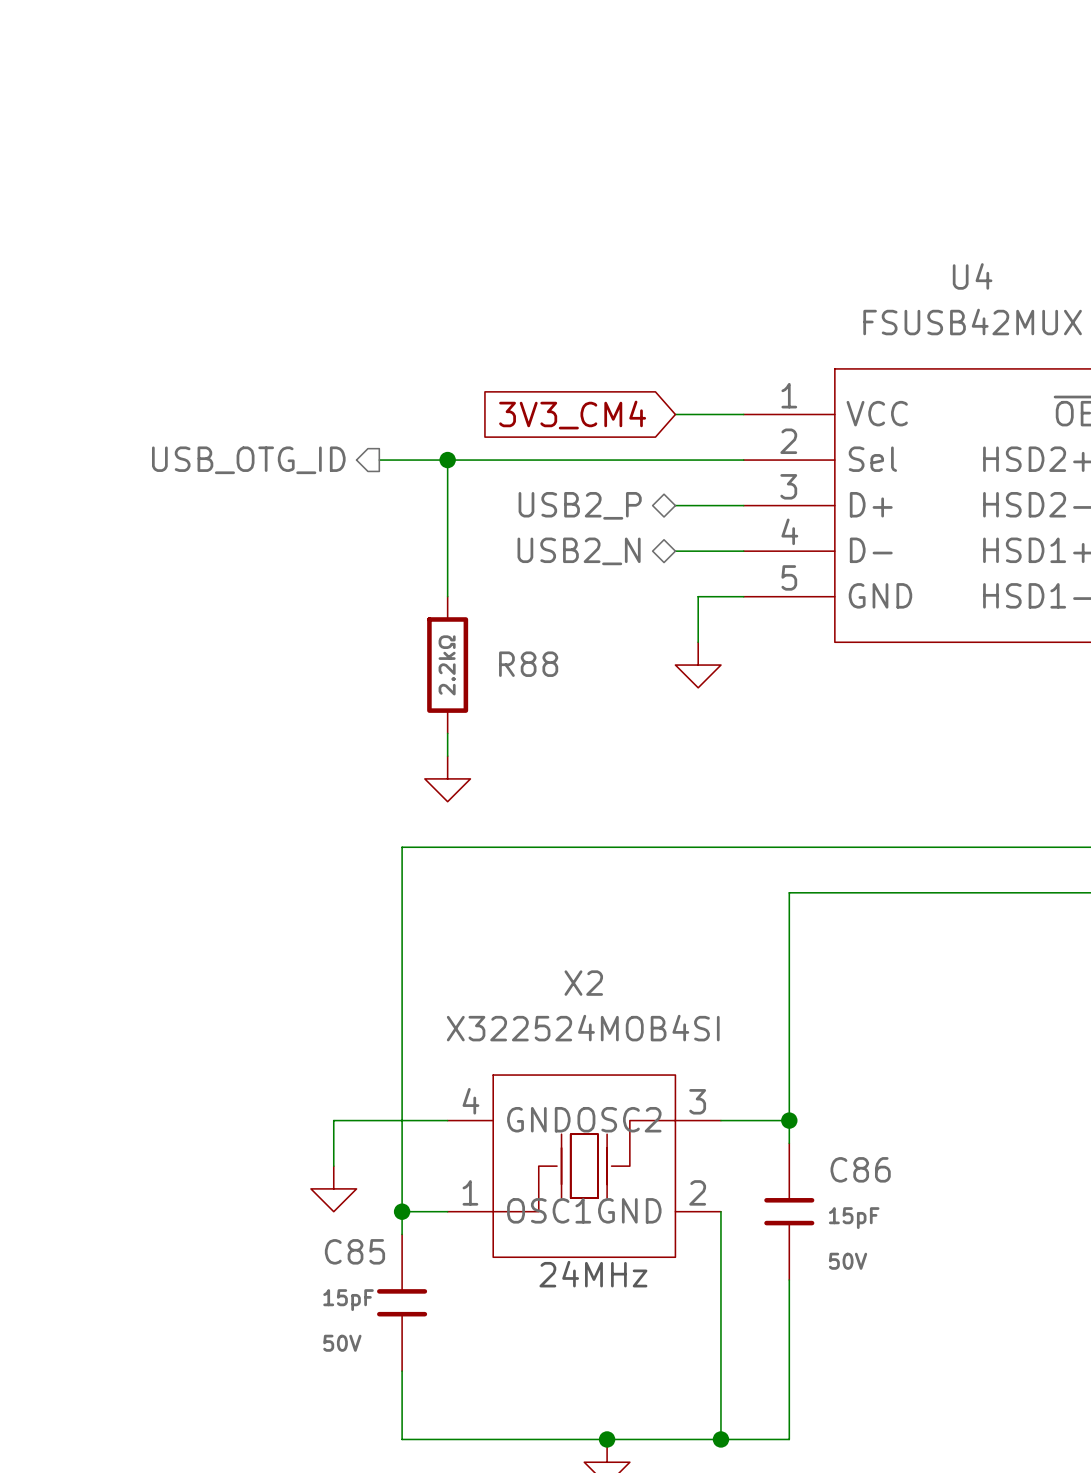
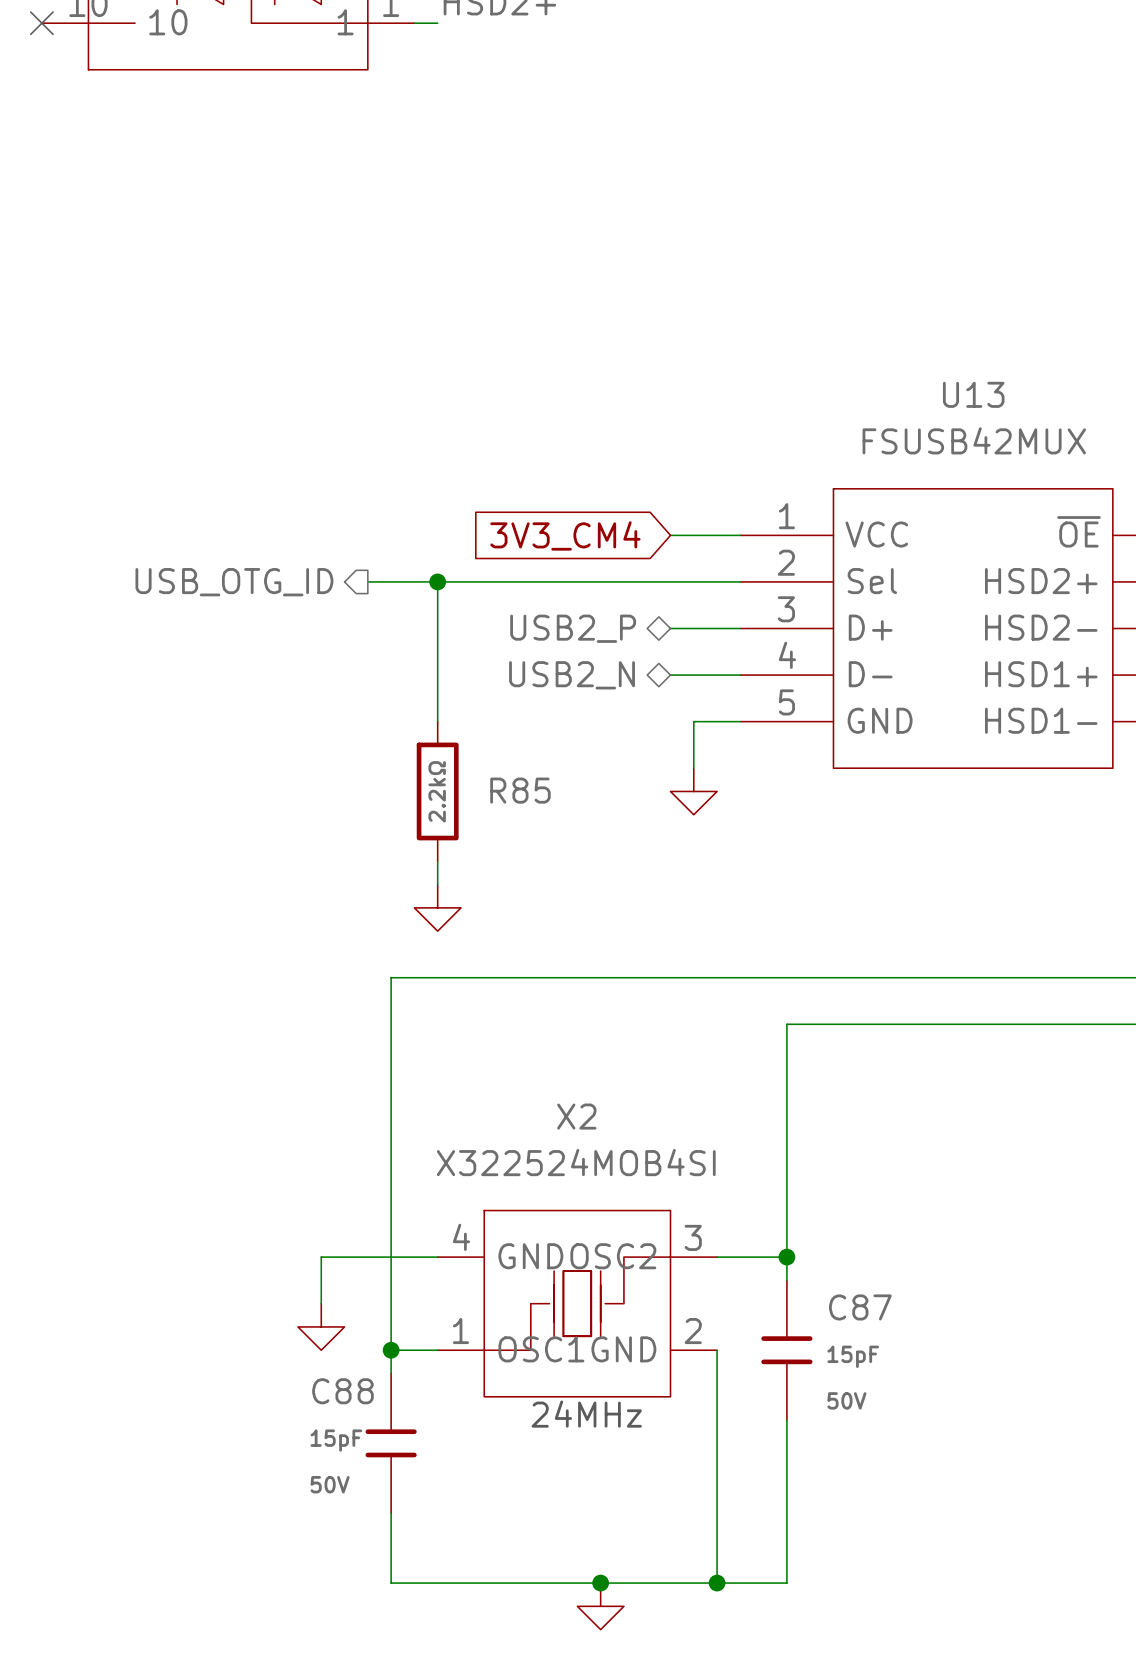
U4 name: U4 (972, 276) -> U13 (973, 394)
R88 name: R88 (528, 664) -> R85 (520, 790)
C86 name: C86 (860, 1169) -> C87 (860, 1307)
C85 name: C85 (354, 1251) -> C88 (342, 1391)

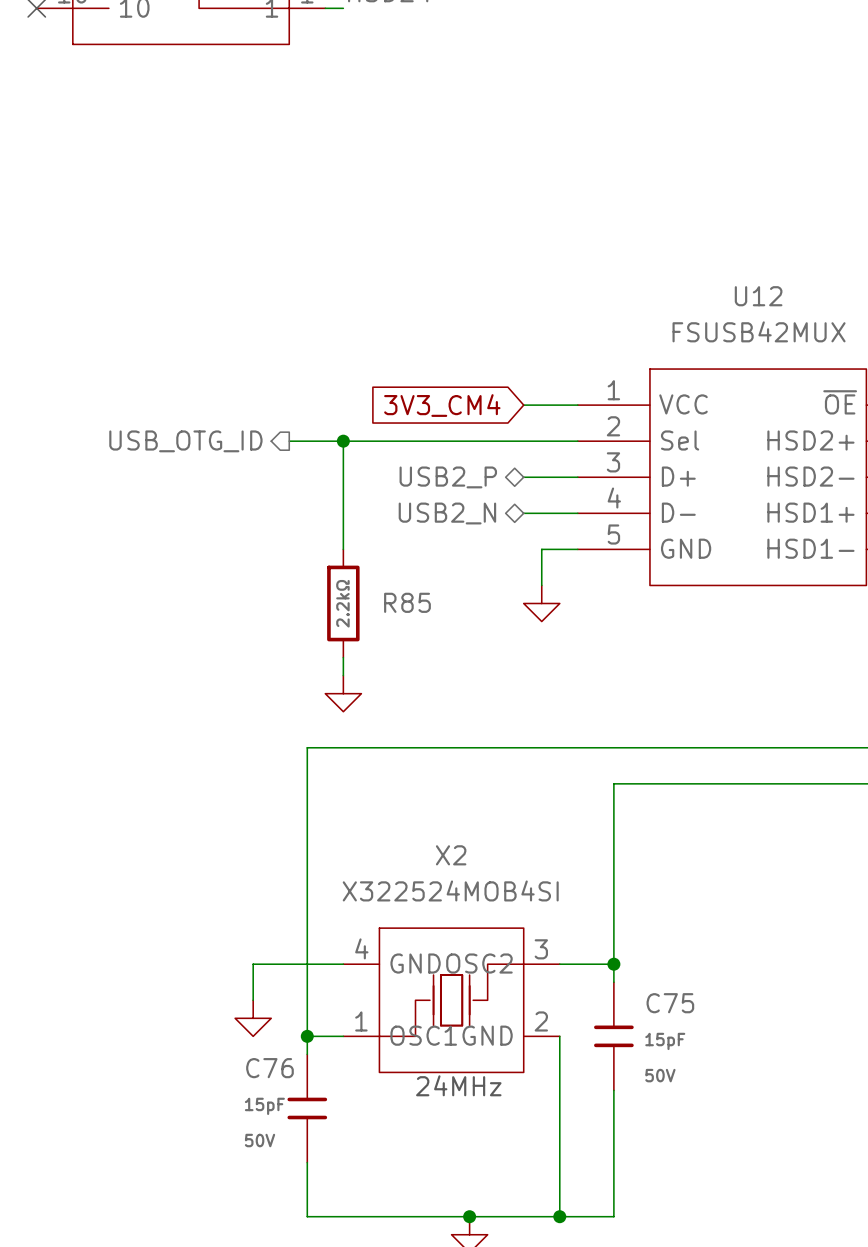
U13 name: U13 (973, 394) -> U12 (758, 296)
C87 name: C87 (860, 1307) -> C75 (670, 1003)
C88 name: C88 (342, 1391) -> C76 (269, 1068)

